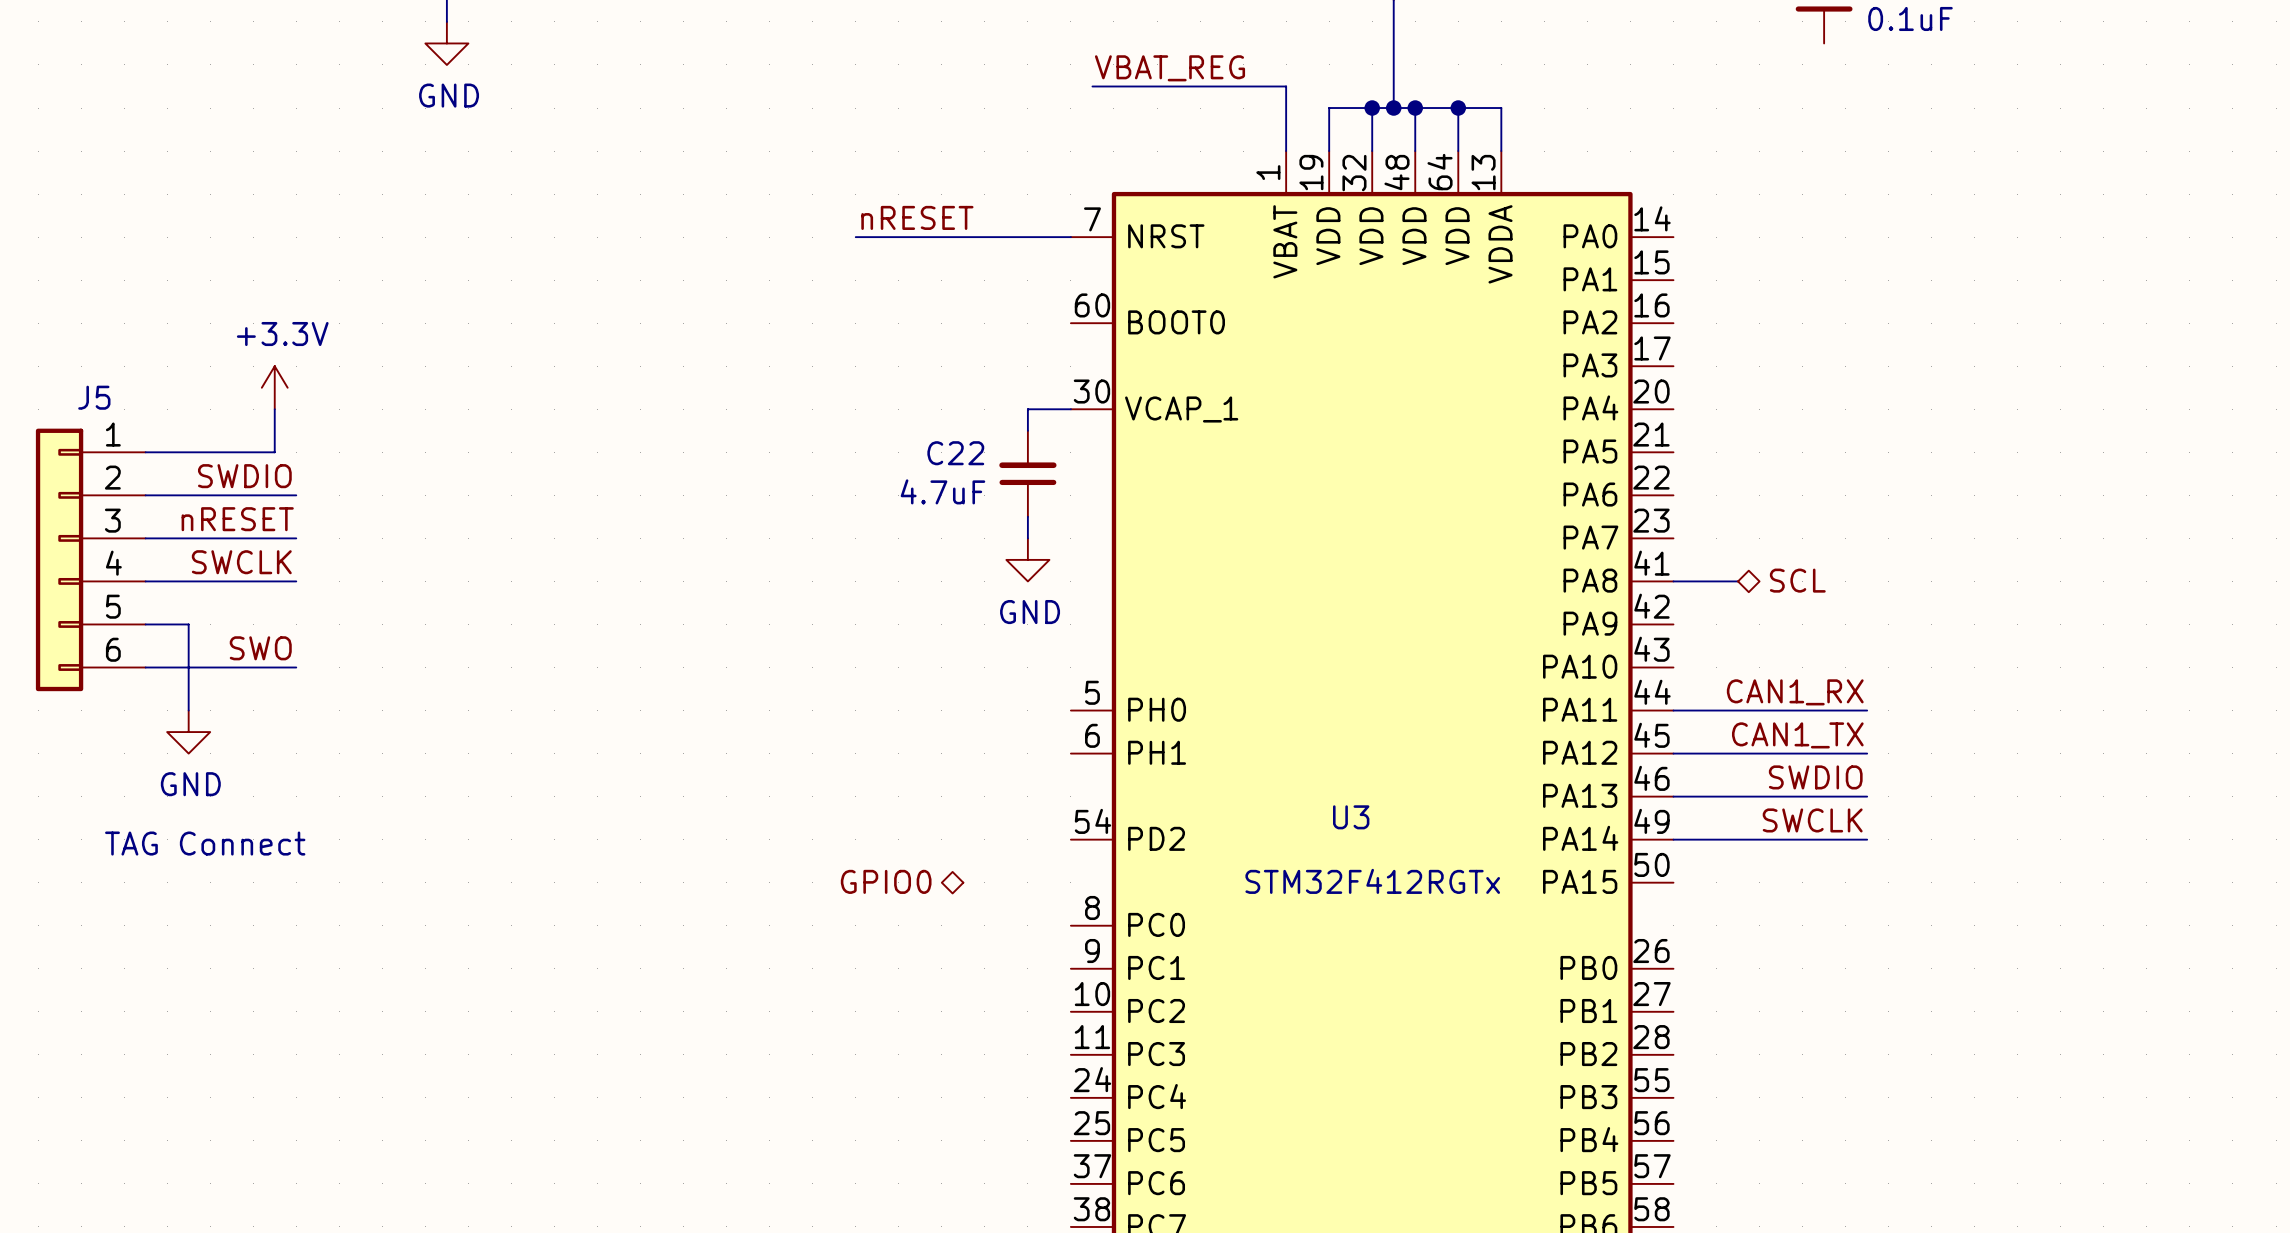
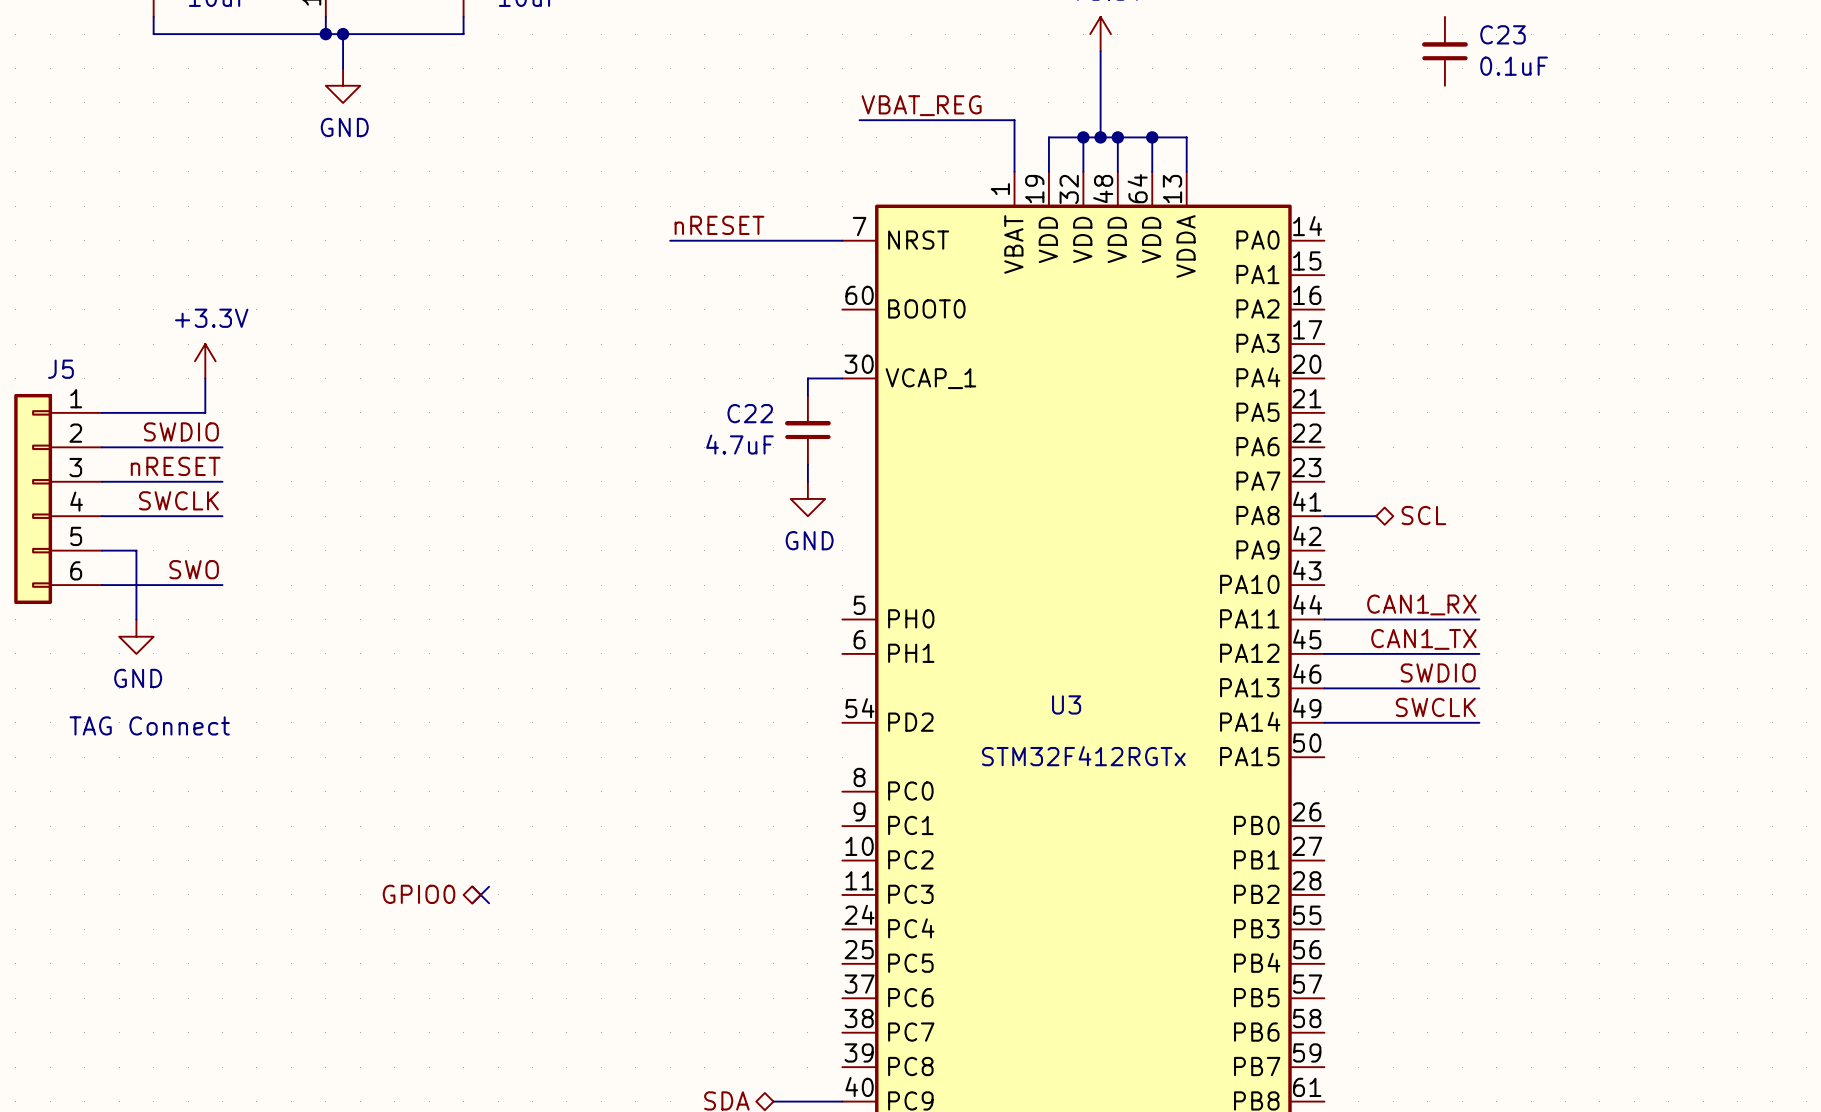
hierarchical label position: GPIO0 (886, 881) -> GPIO0 (419, 894)
no-connect mark: none -> (480, 894)

